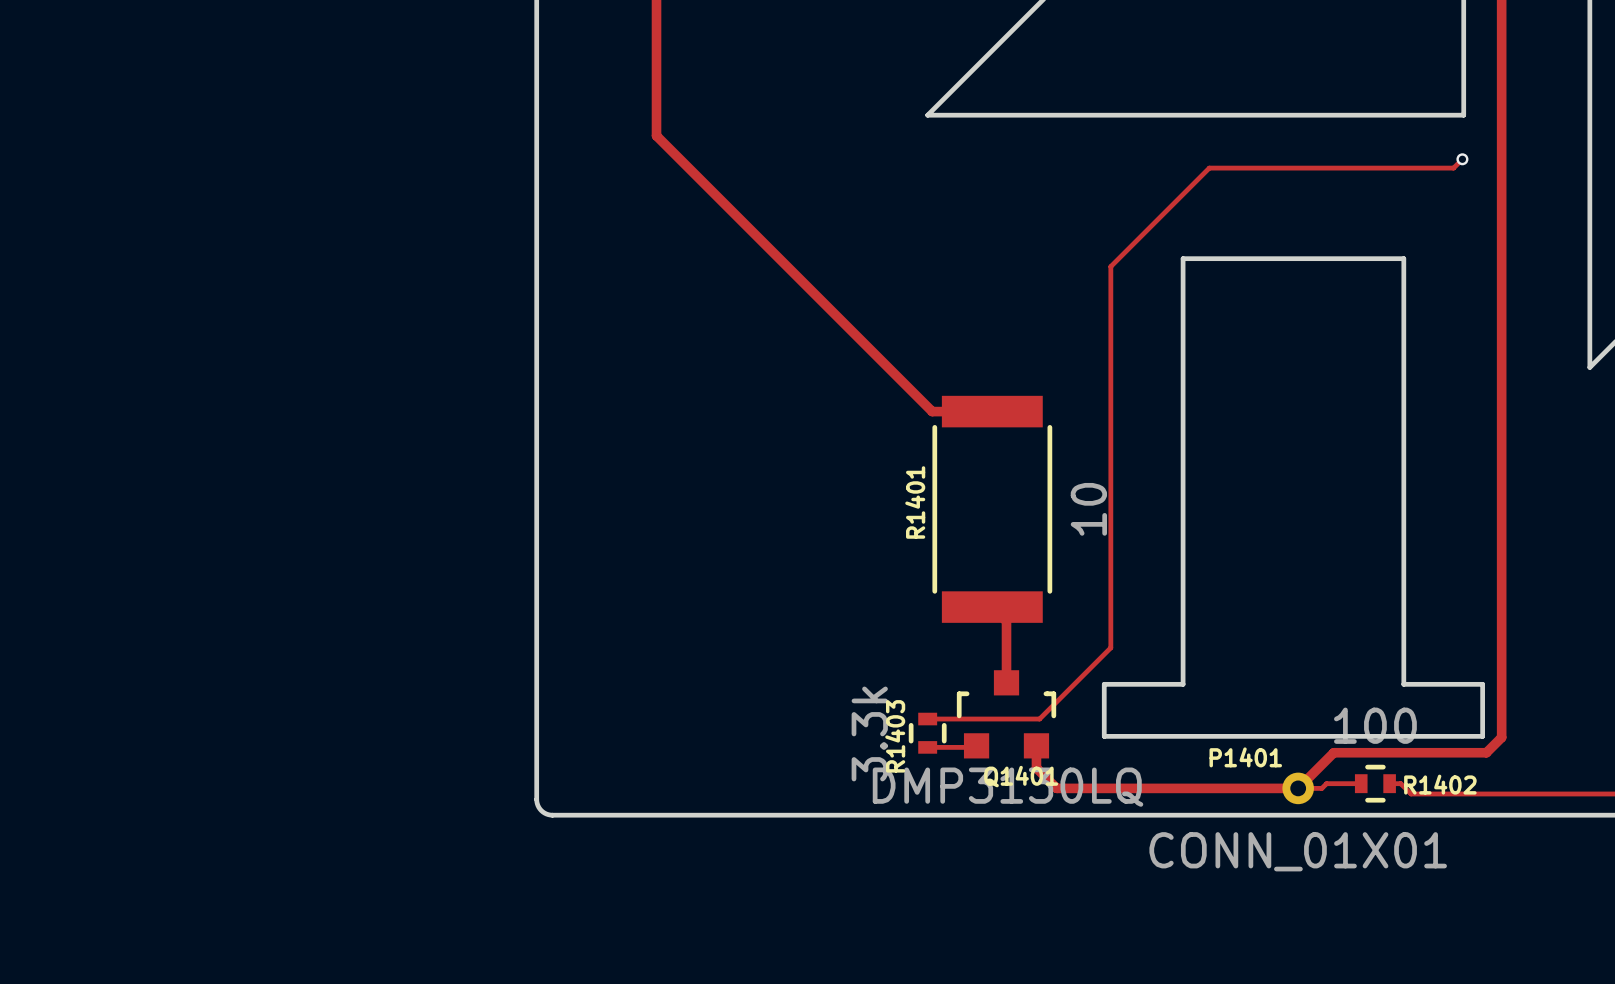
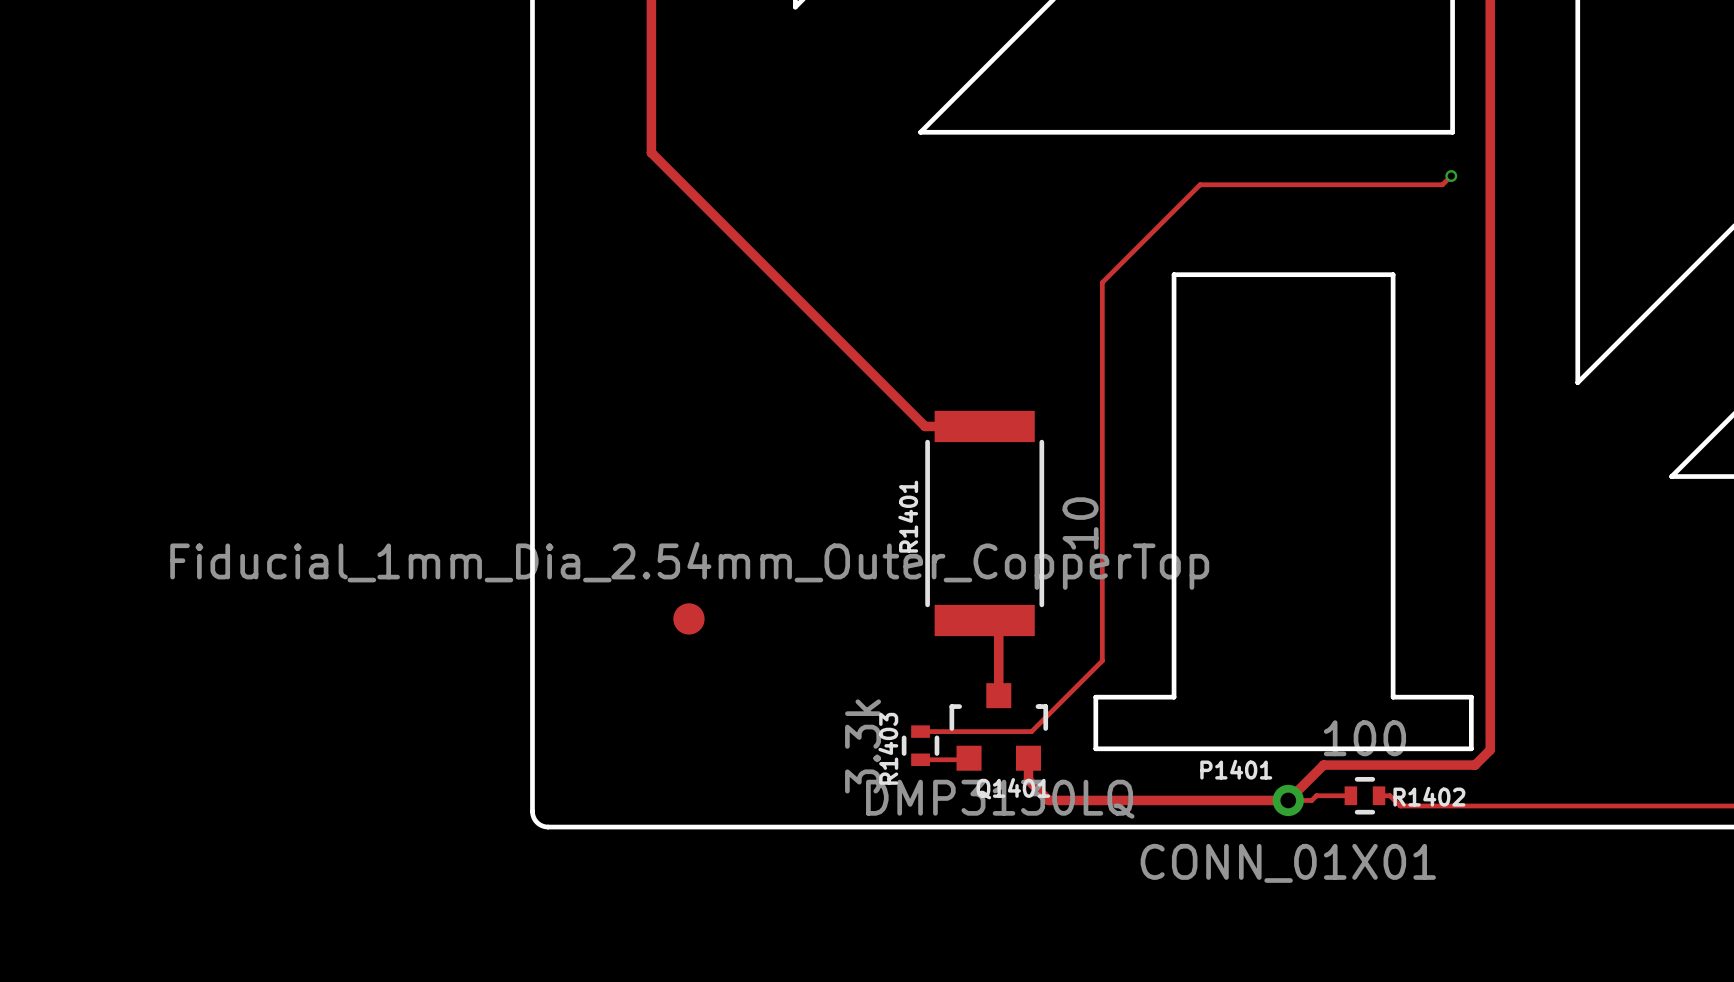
part: none -> Fiducial_1mm_Dia_2.54mm_Outer_CopperTop (688, 618)

